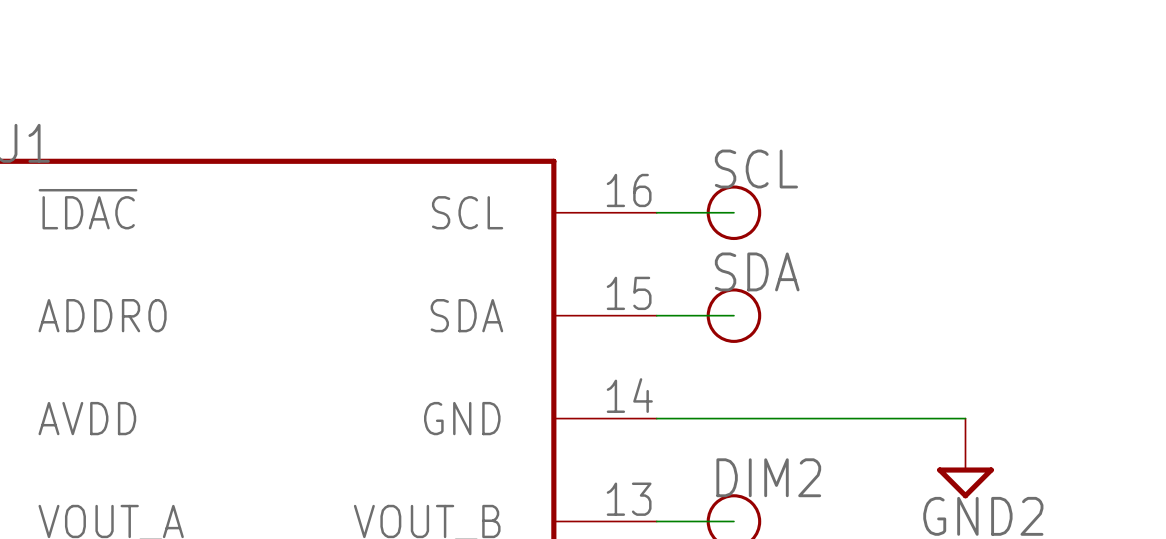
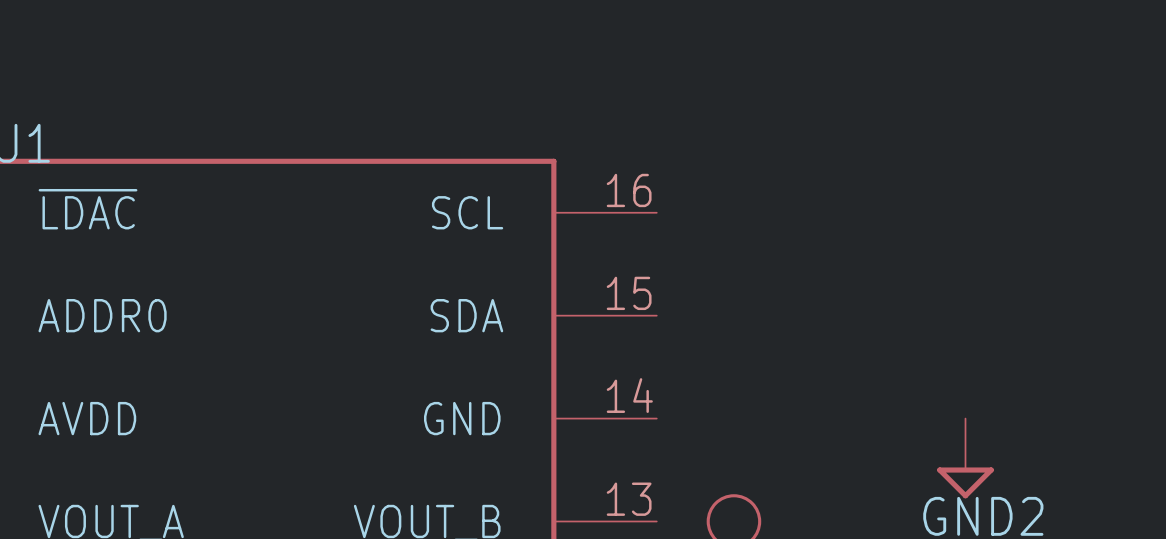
label: SCL (756, 169) -> none
drawing: [706, 185, 762, 241] -> none
wire: (656, 212) (733, 212) -> none
label: SDA (757, 271) -> none
drawing: [706, 288, 762, 343] -> none
wire: (656, 315) (733, 315) -> none
wire: (656, 418) (965, 418) -> none
label: DIM2 (768, 477) -> none
wire: (656, 521) (733, 521) -> none

